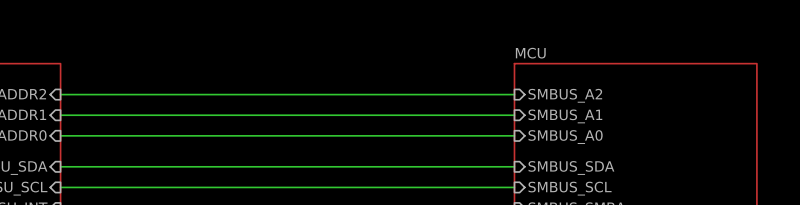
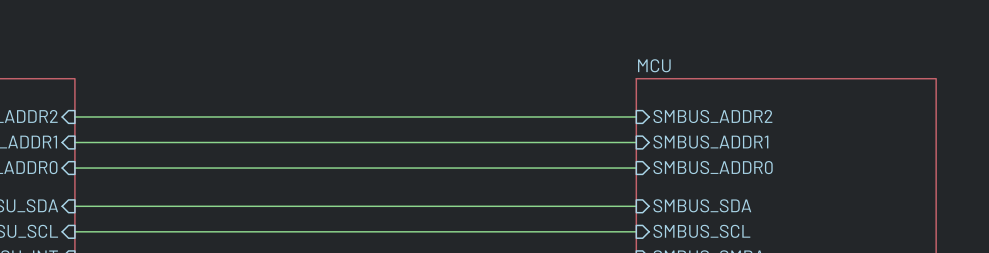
sheet pin: SMBUS_A2 (565, 95) -> SMBUS_ADDR2 (712, 116)
sheet pin: SMBUS_A1 (565, 116) -> SMBUS_ADDR1 (710, 142)
sheet pin: SMBUS_A0 (565, 137) -> SMBUS_ADDR0 (713, 167)

